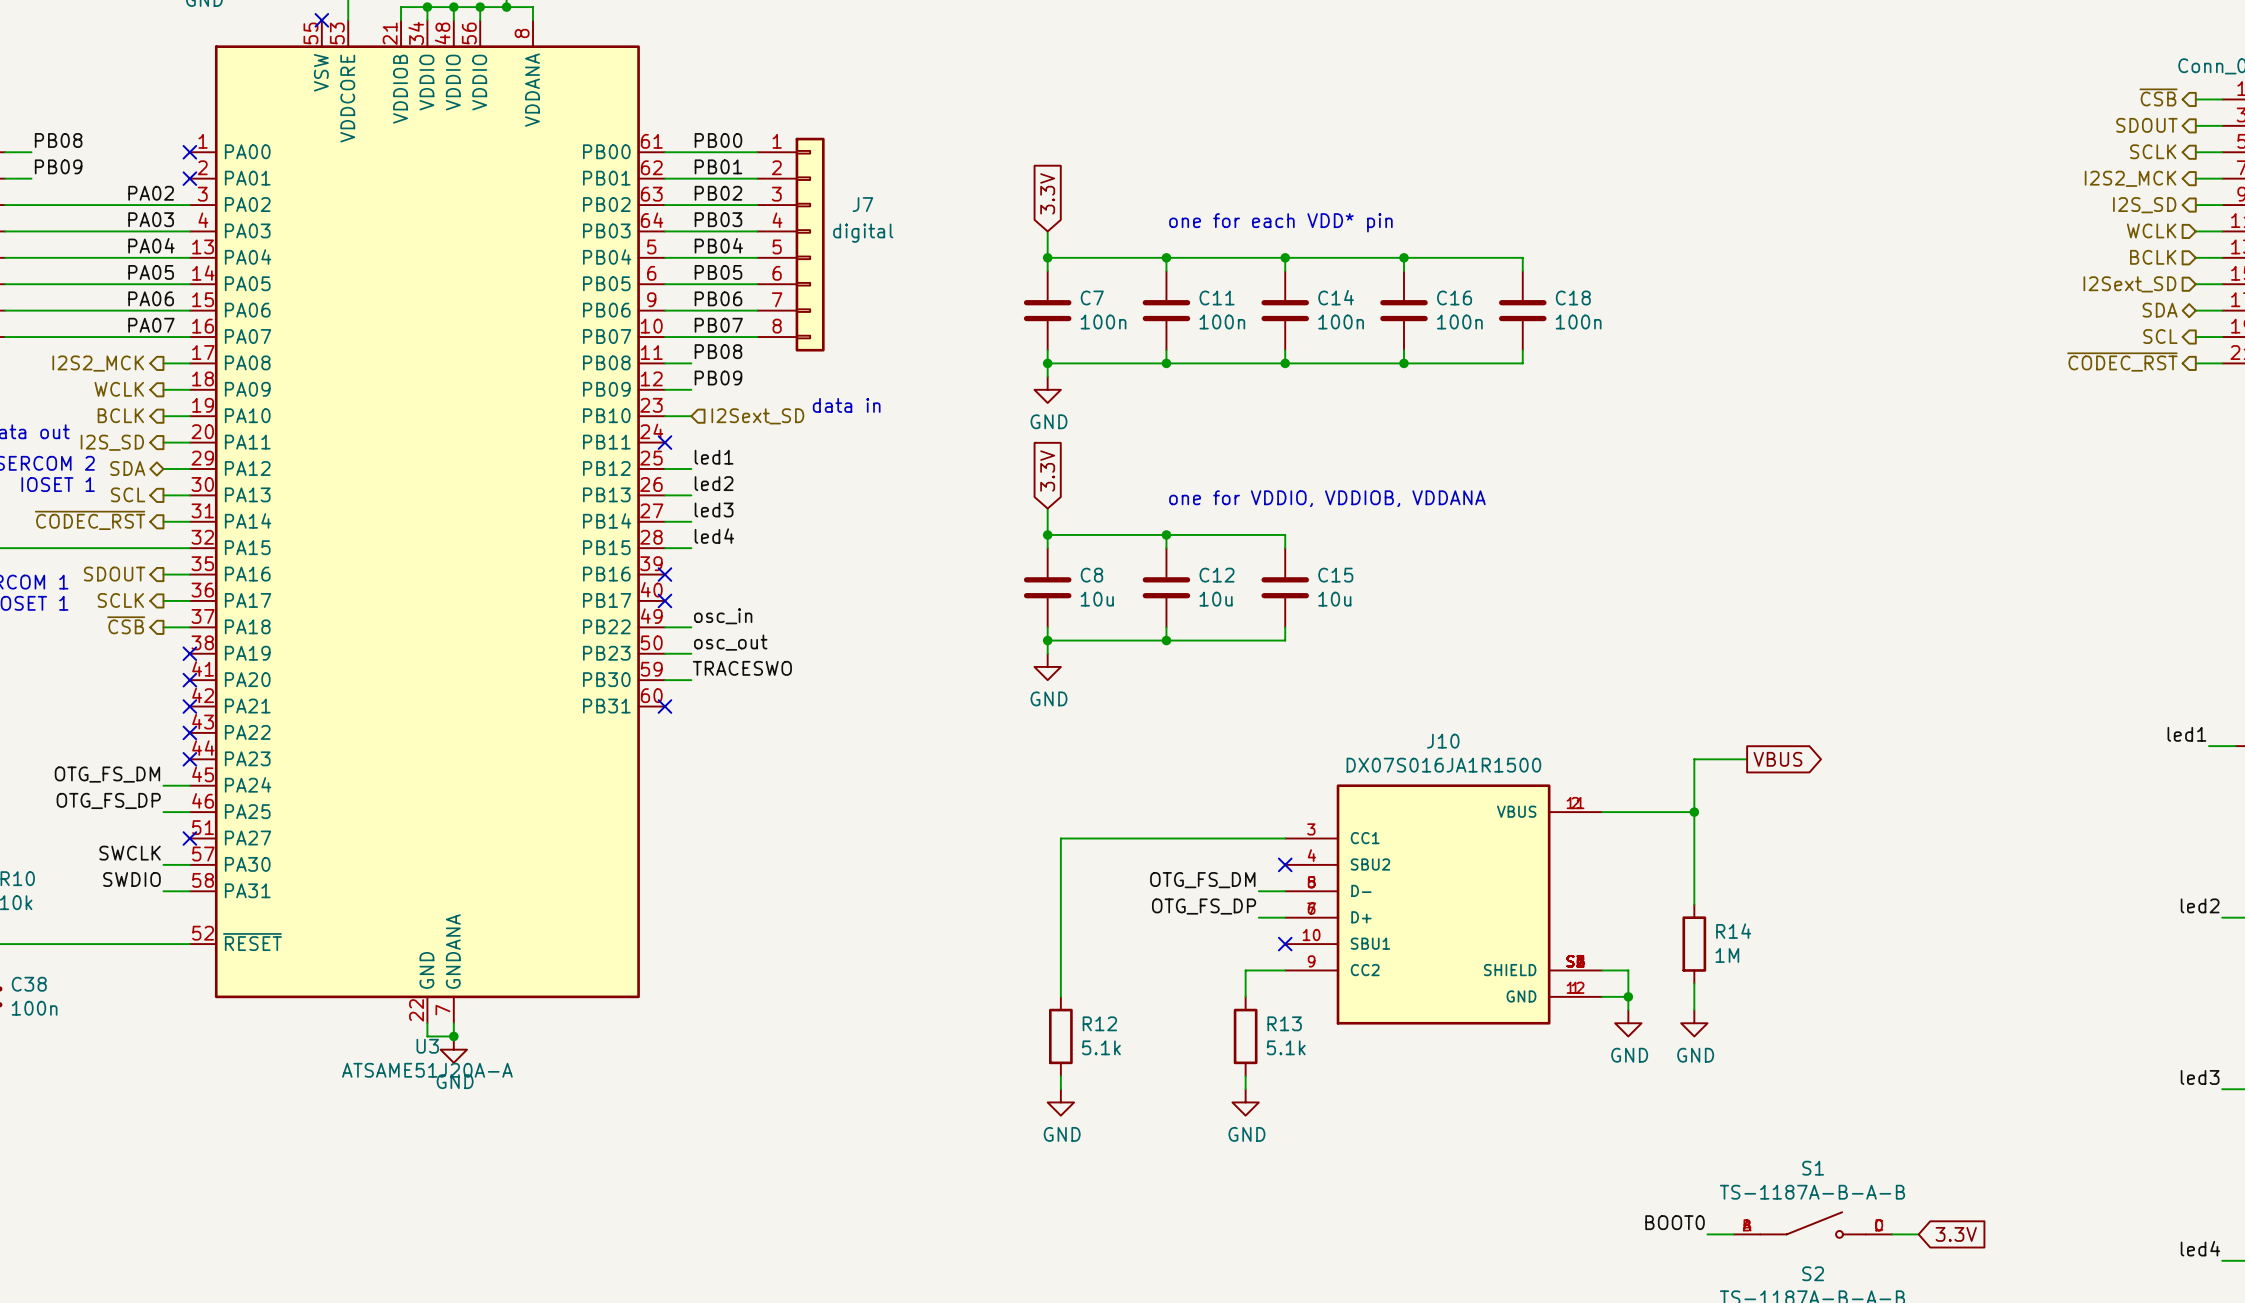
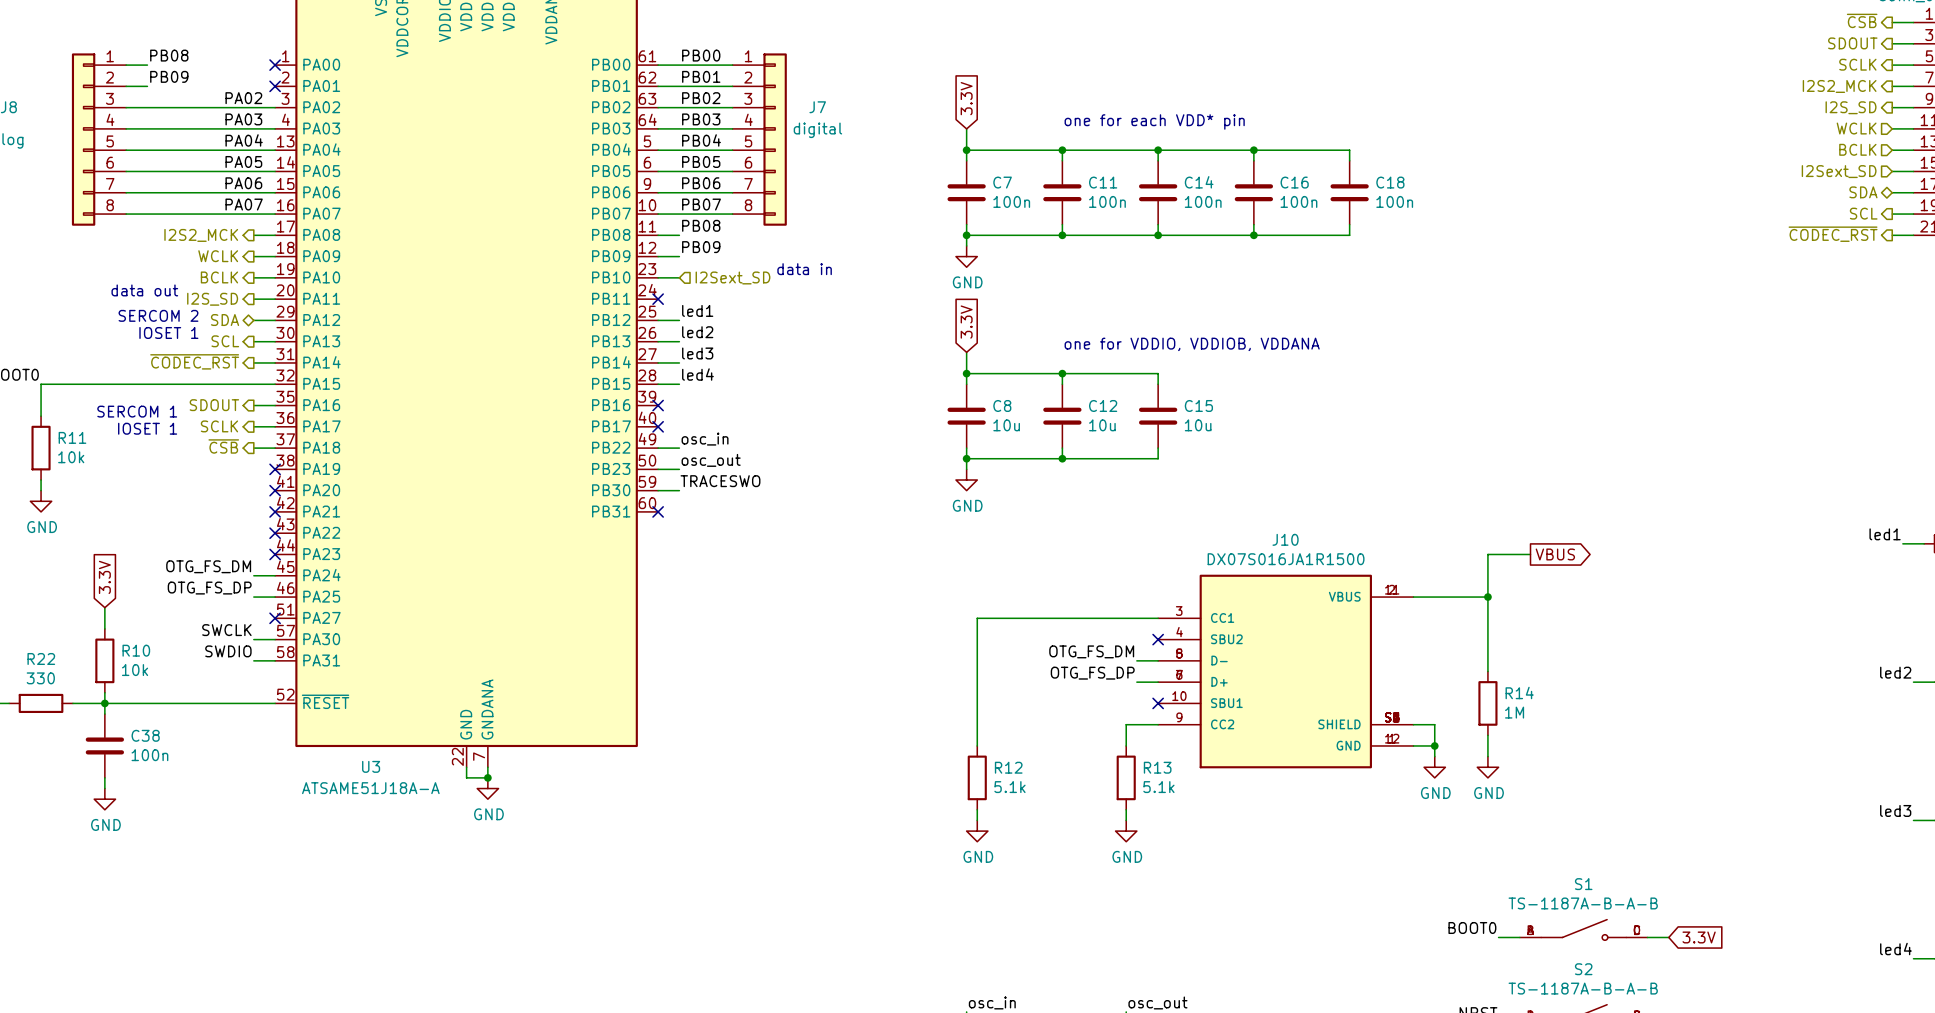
U3 name position: U3 (427, 1046) -> U3 (371, 766)
U3 value: ATSAME51J20A-A (427, 1070) -> ATSAME51J18A-A (370, 788)

